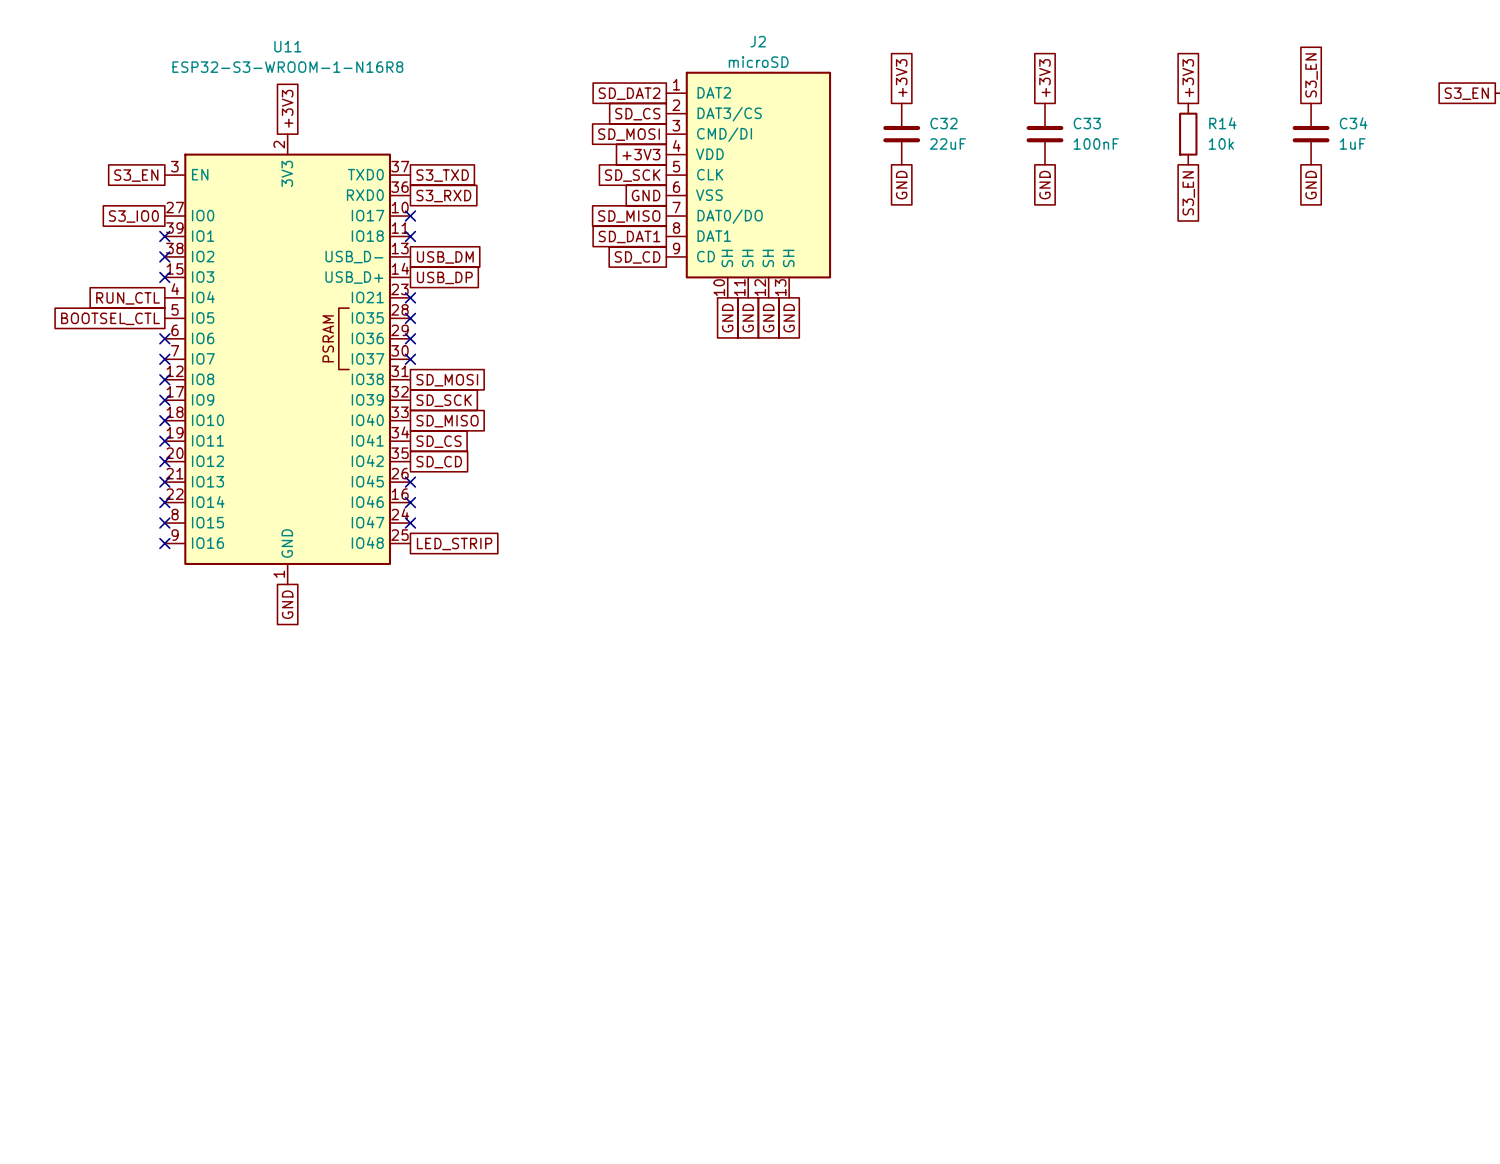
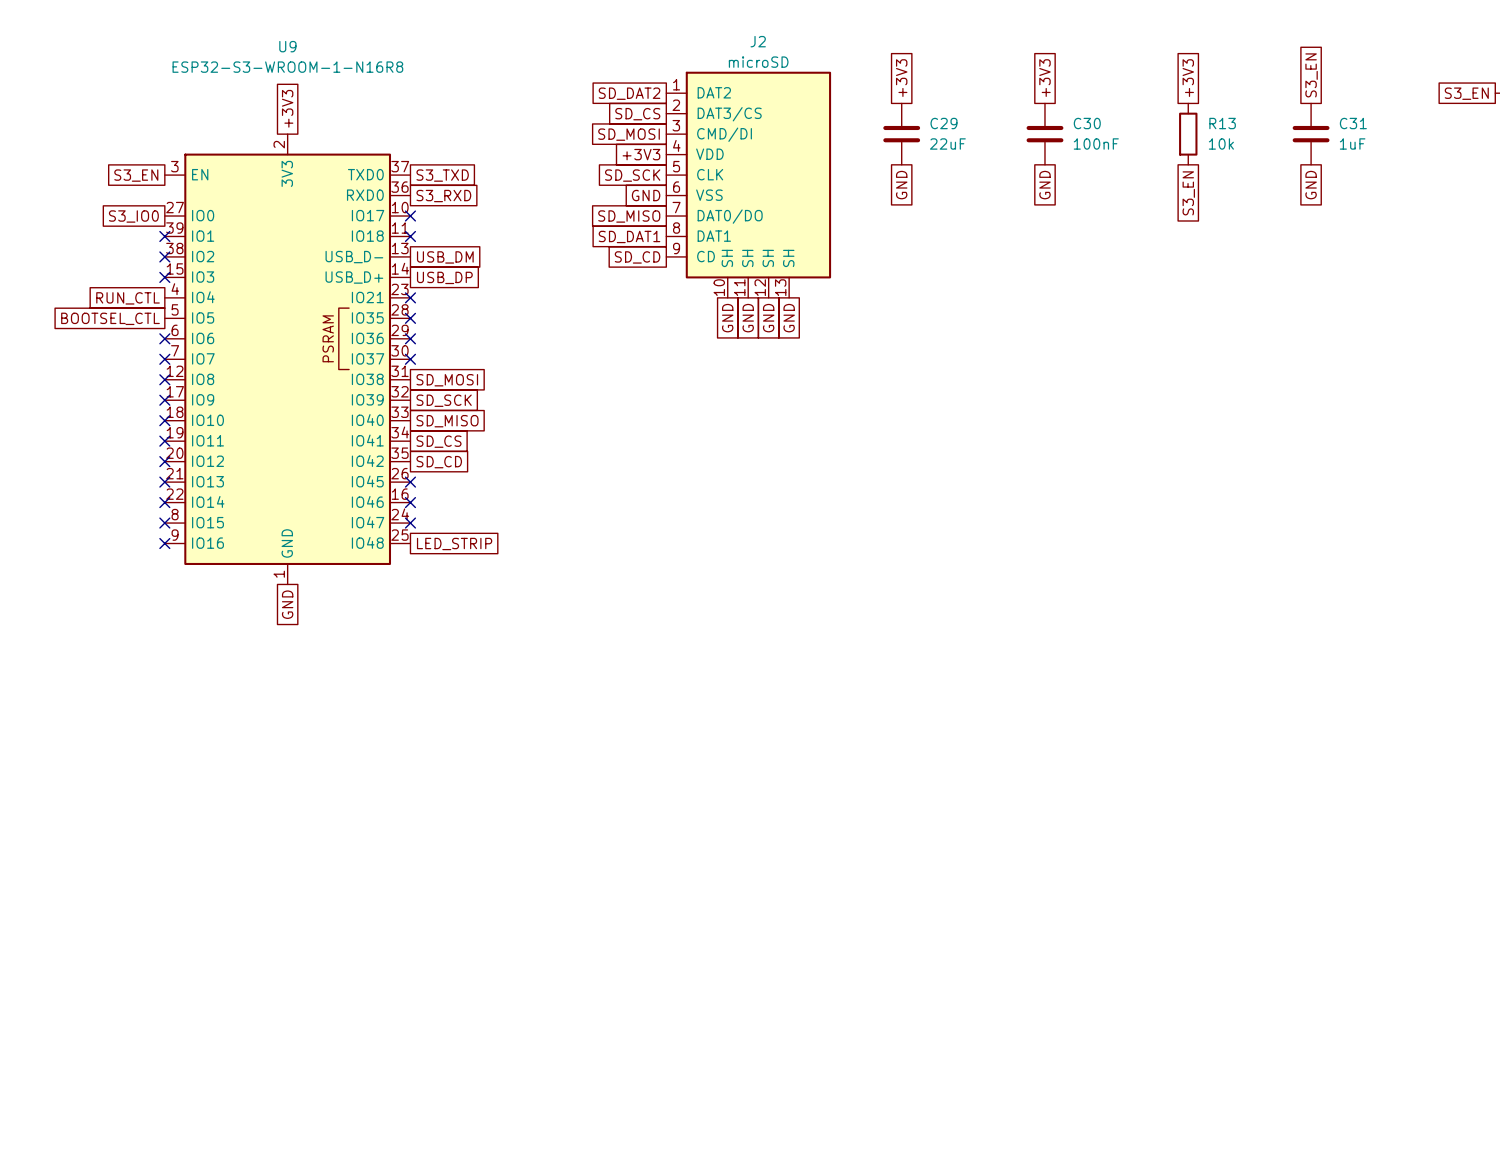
U11 name: U11 (287, 46) -> U9 (287, 46)
C32 name: C32 (943, 123) -> C29 (943, 123)
C33 name: C33 (1087, 123) -> C30 (1087, 123)
R14 name: R14 (1222, 123) -> R13 (1222, 123)
C34 name: C34 (1353, 123) -> C31 (1353, 123)

